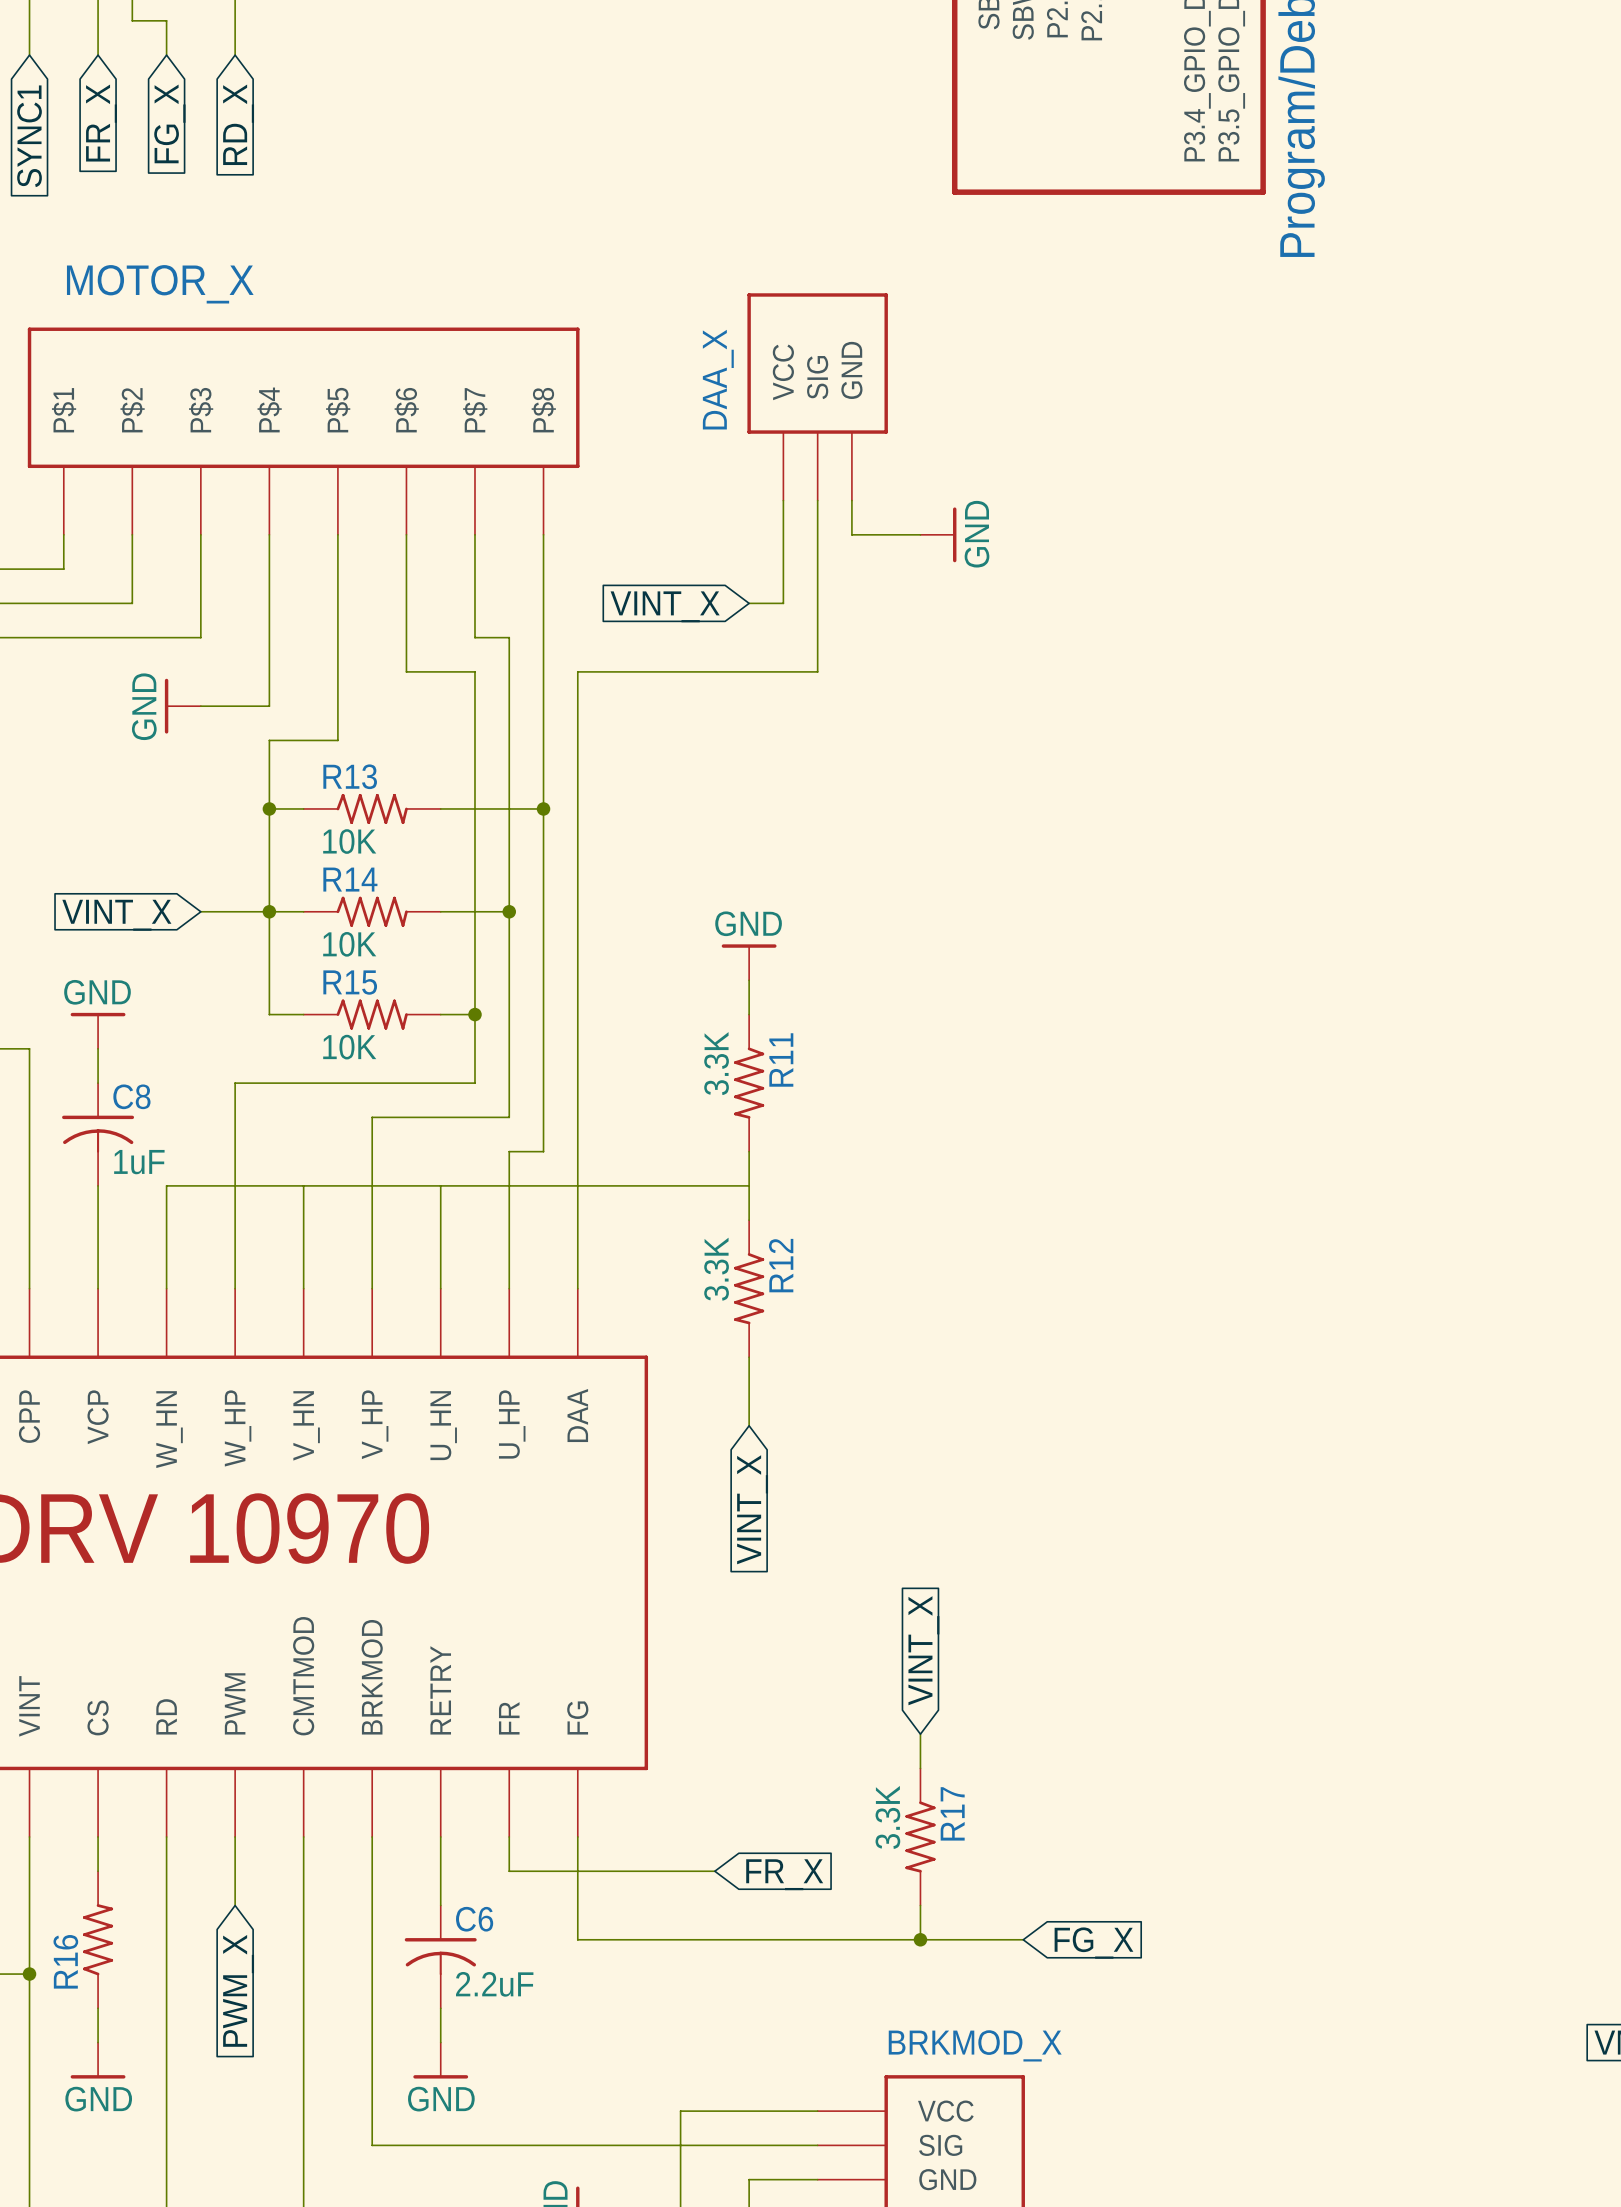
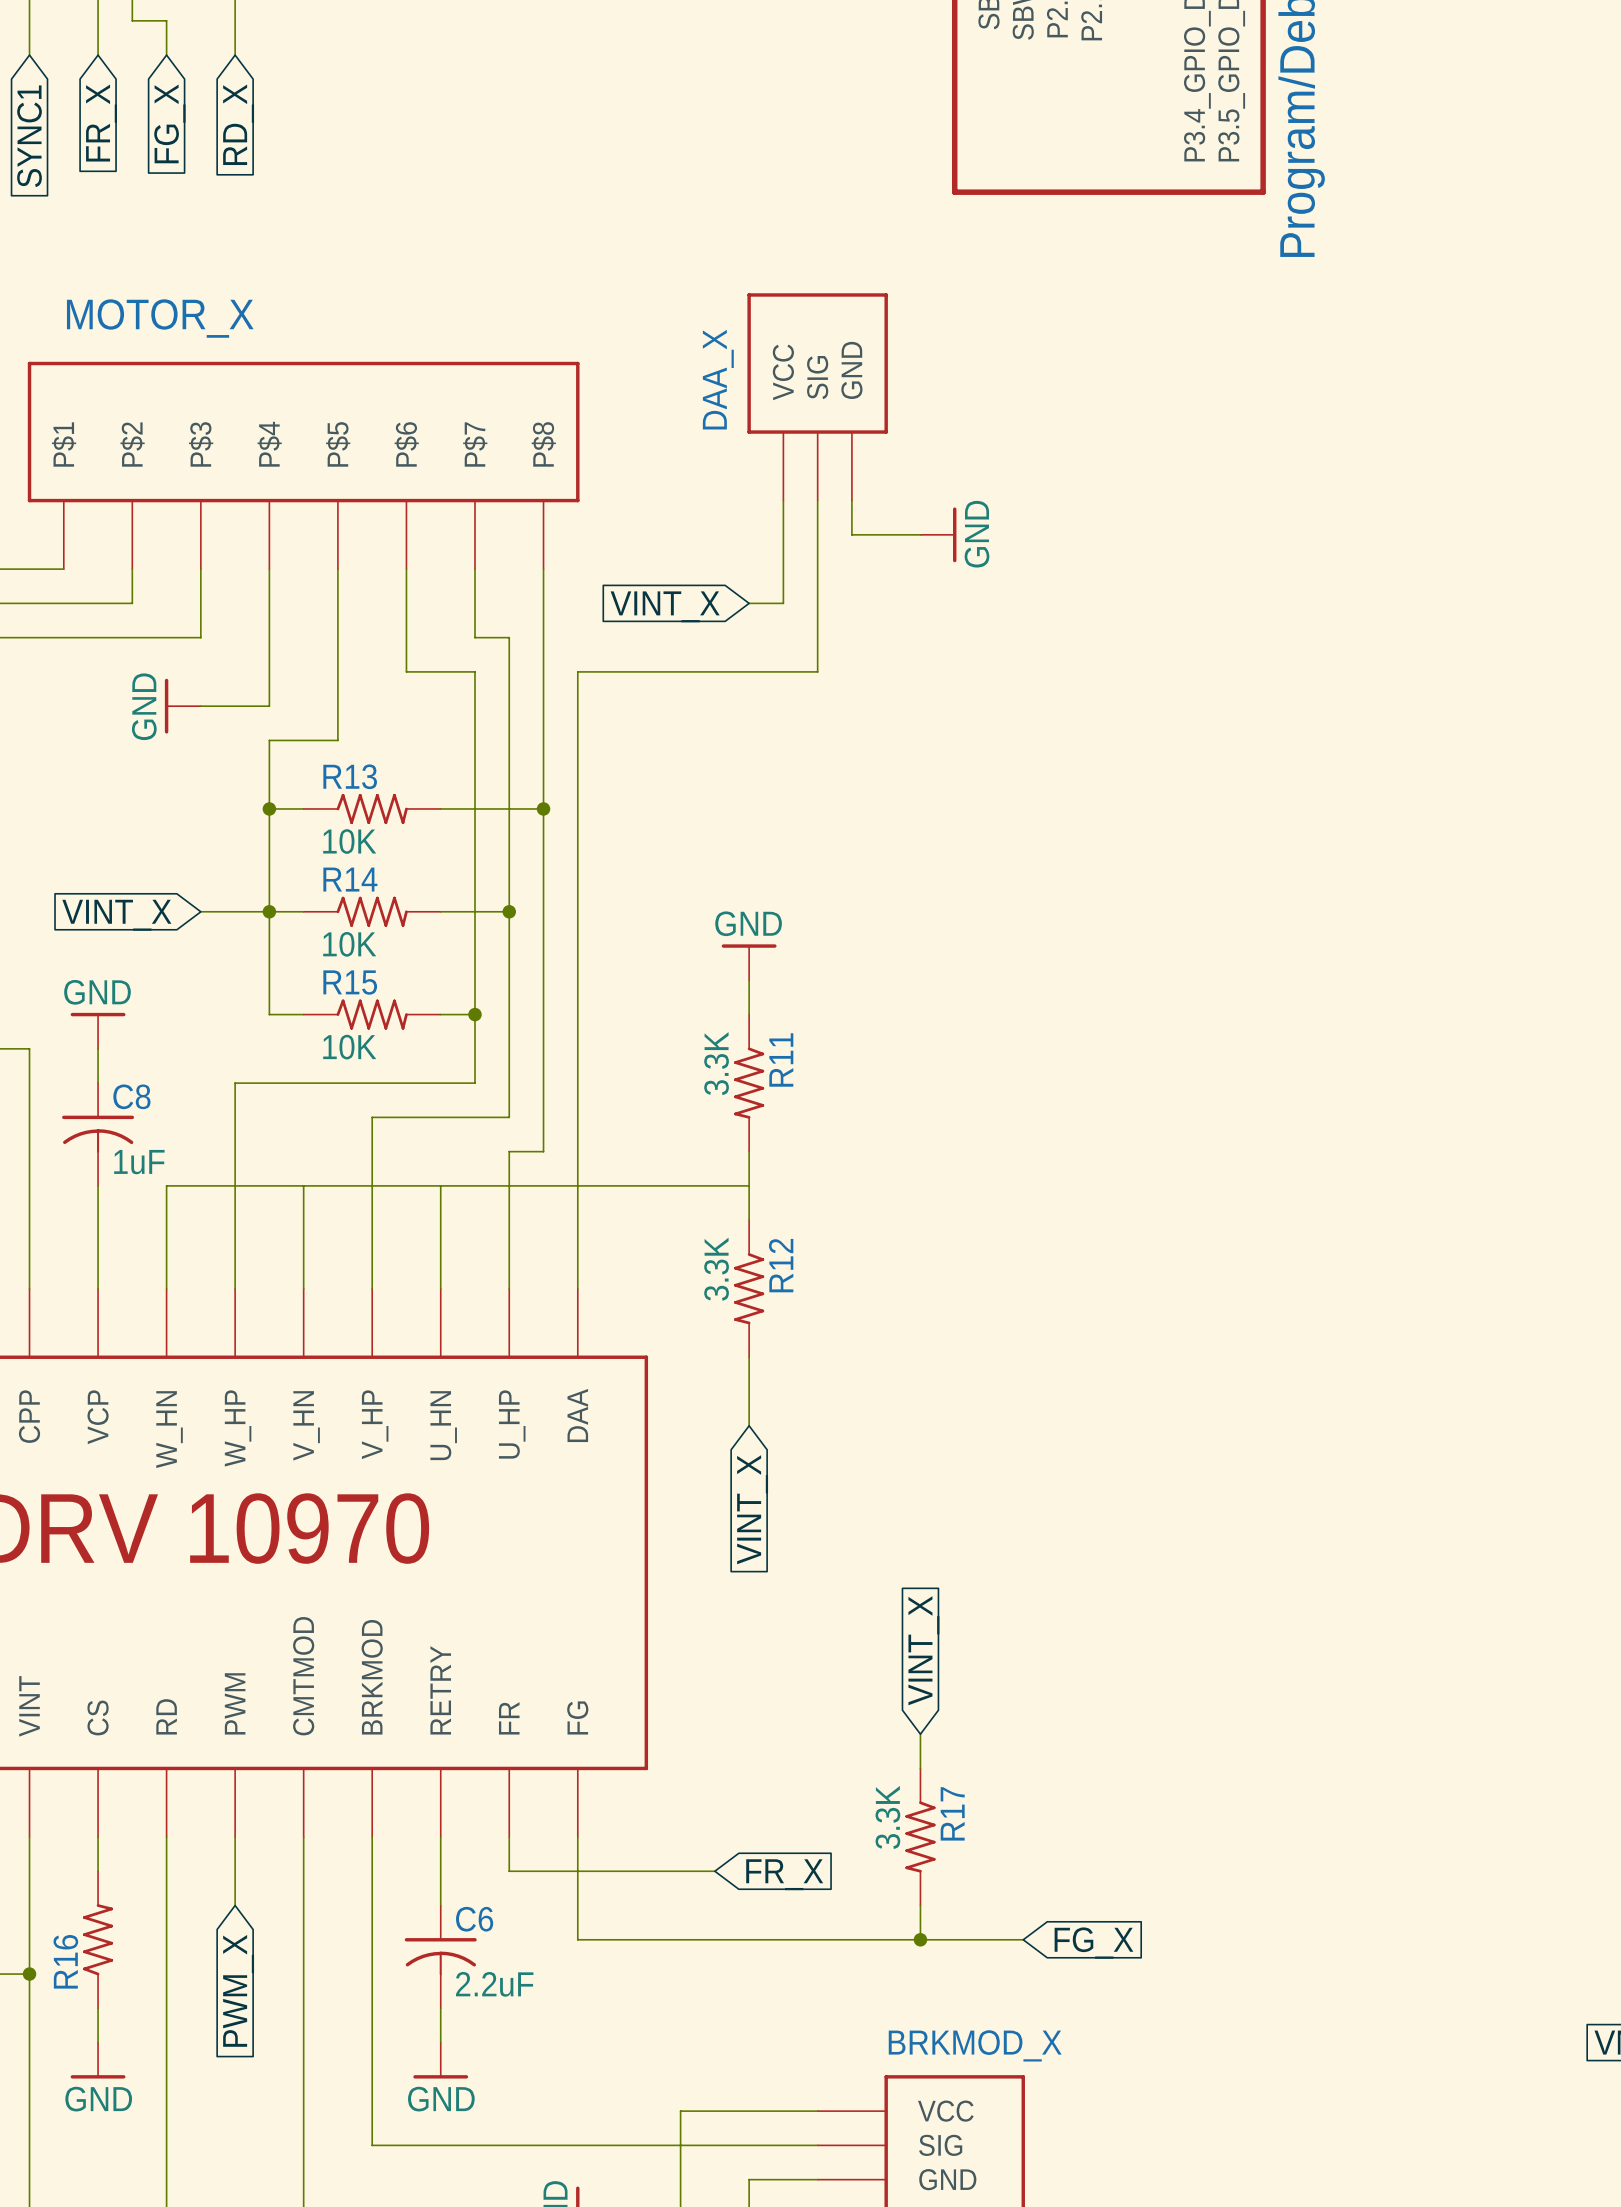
MOTOR_X position: (303, 431) -> (303, 465)

